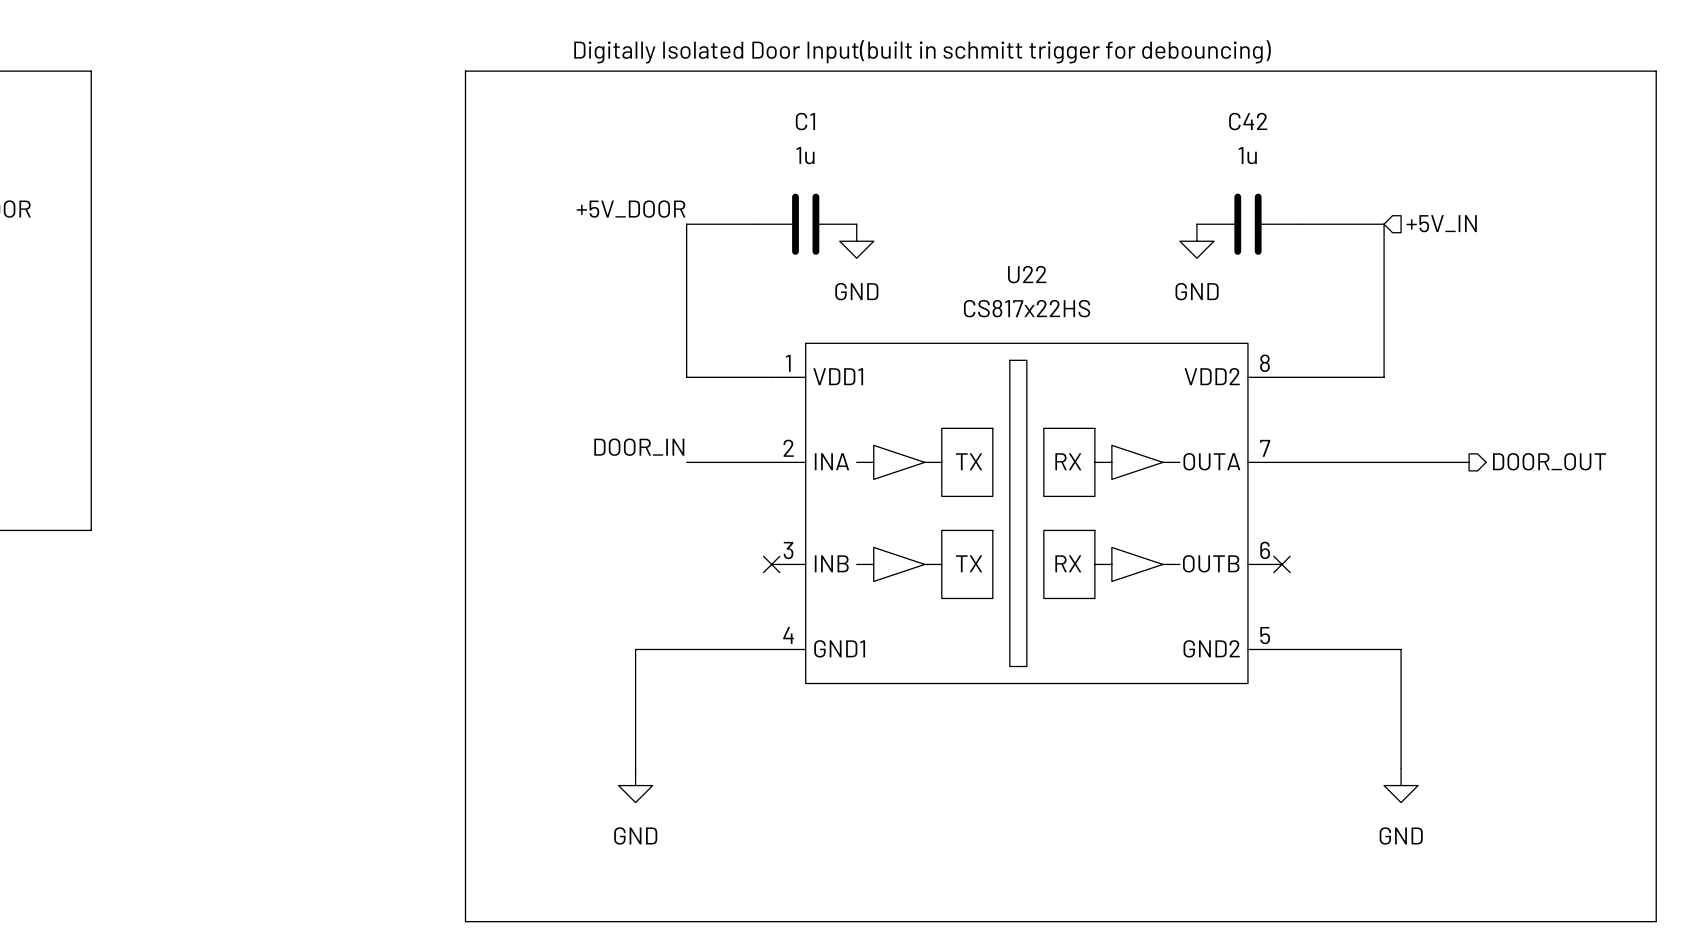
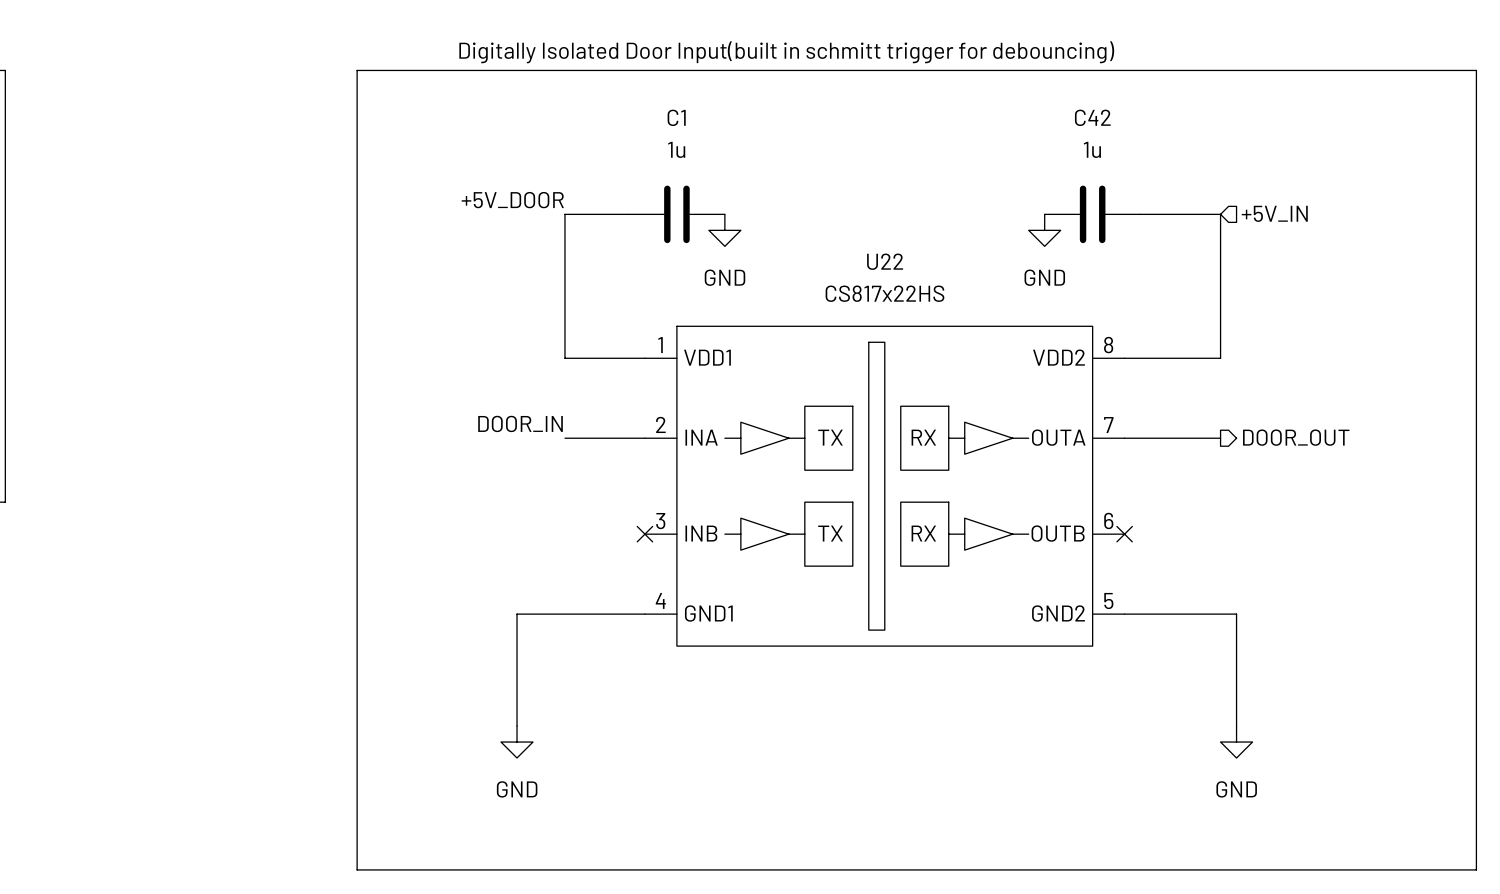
hierarchical label position: DOOR_OUT (1549, 461) -> DOOR_OUT (1296, 437)
wire: (1384, 462) (1469, 462) -> none

